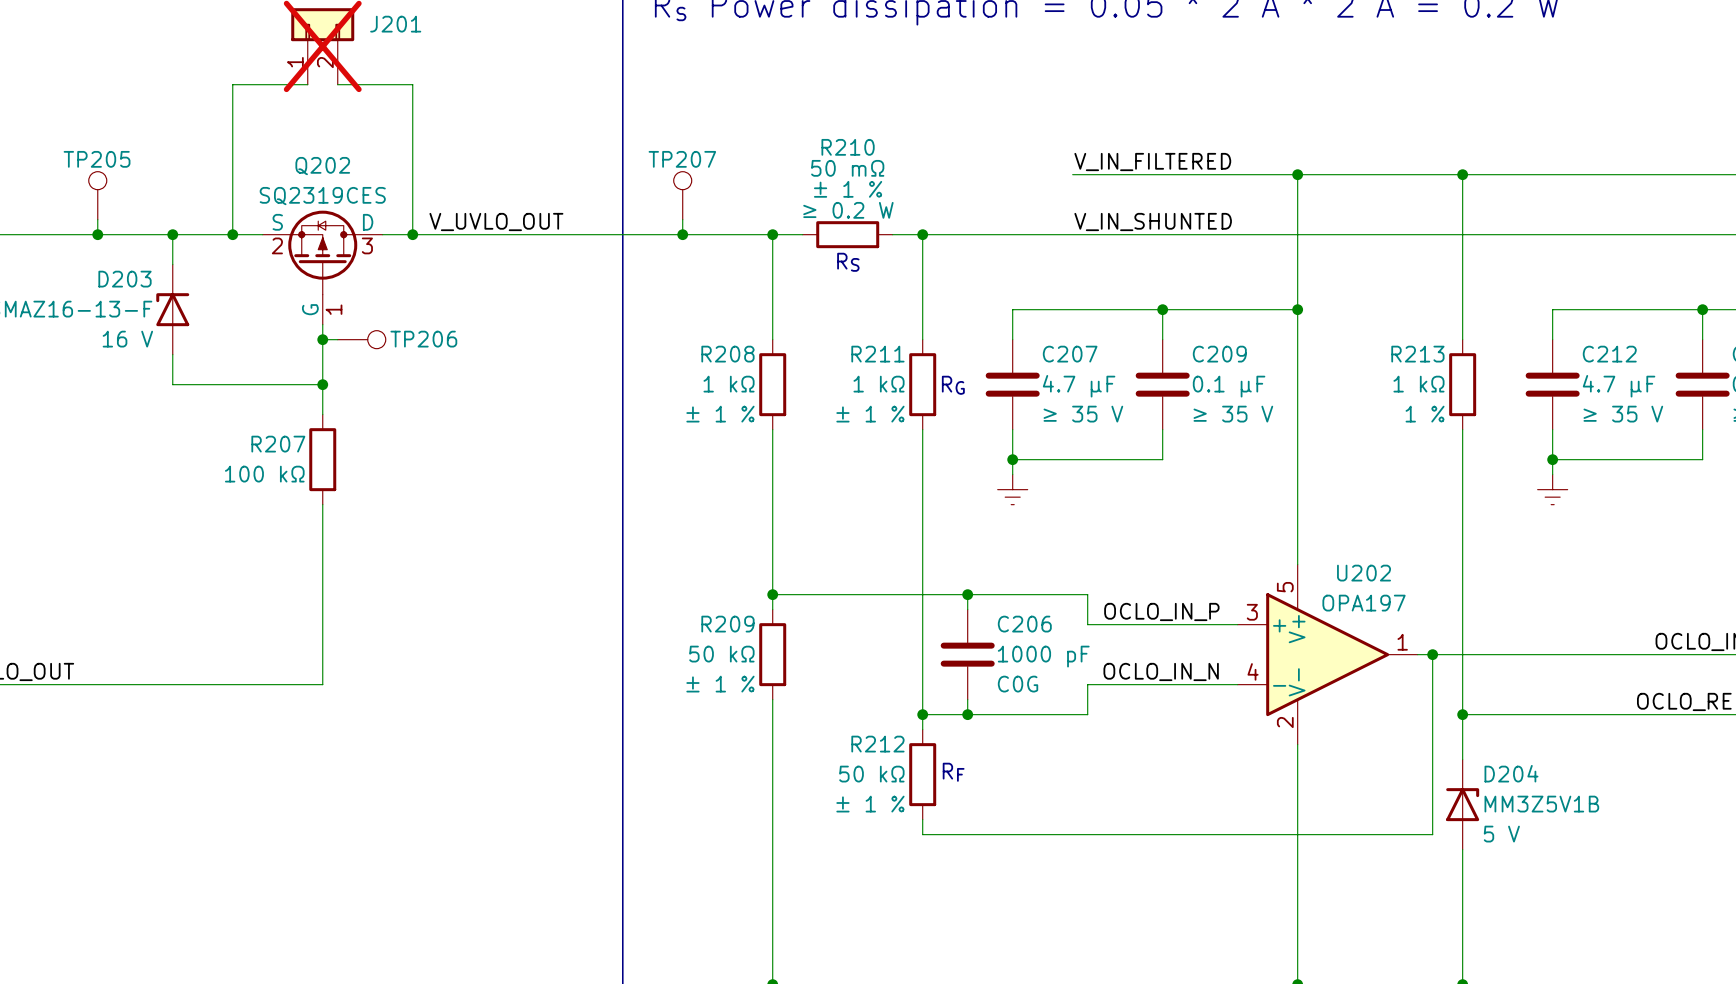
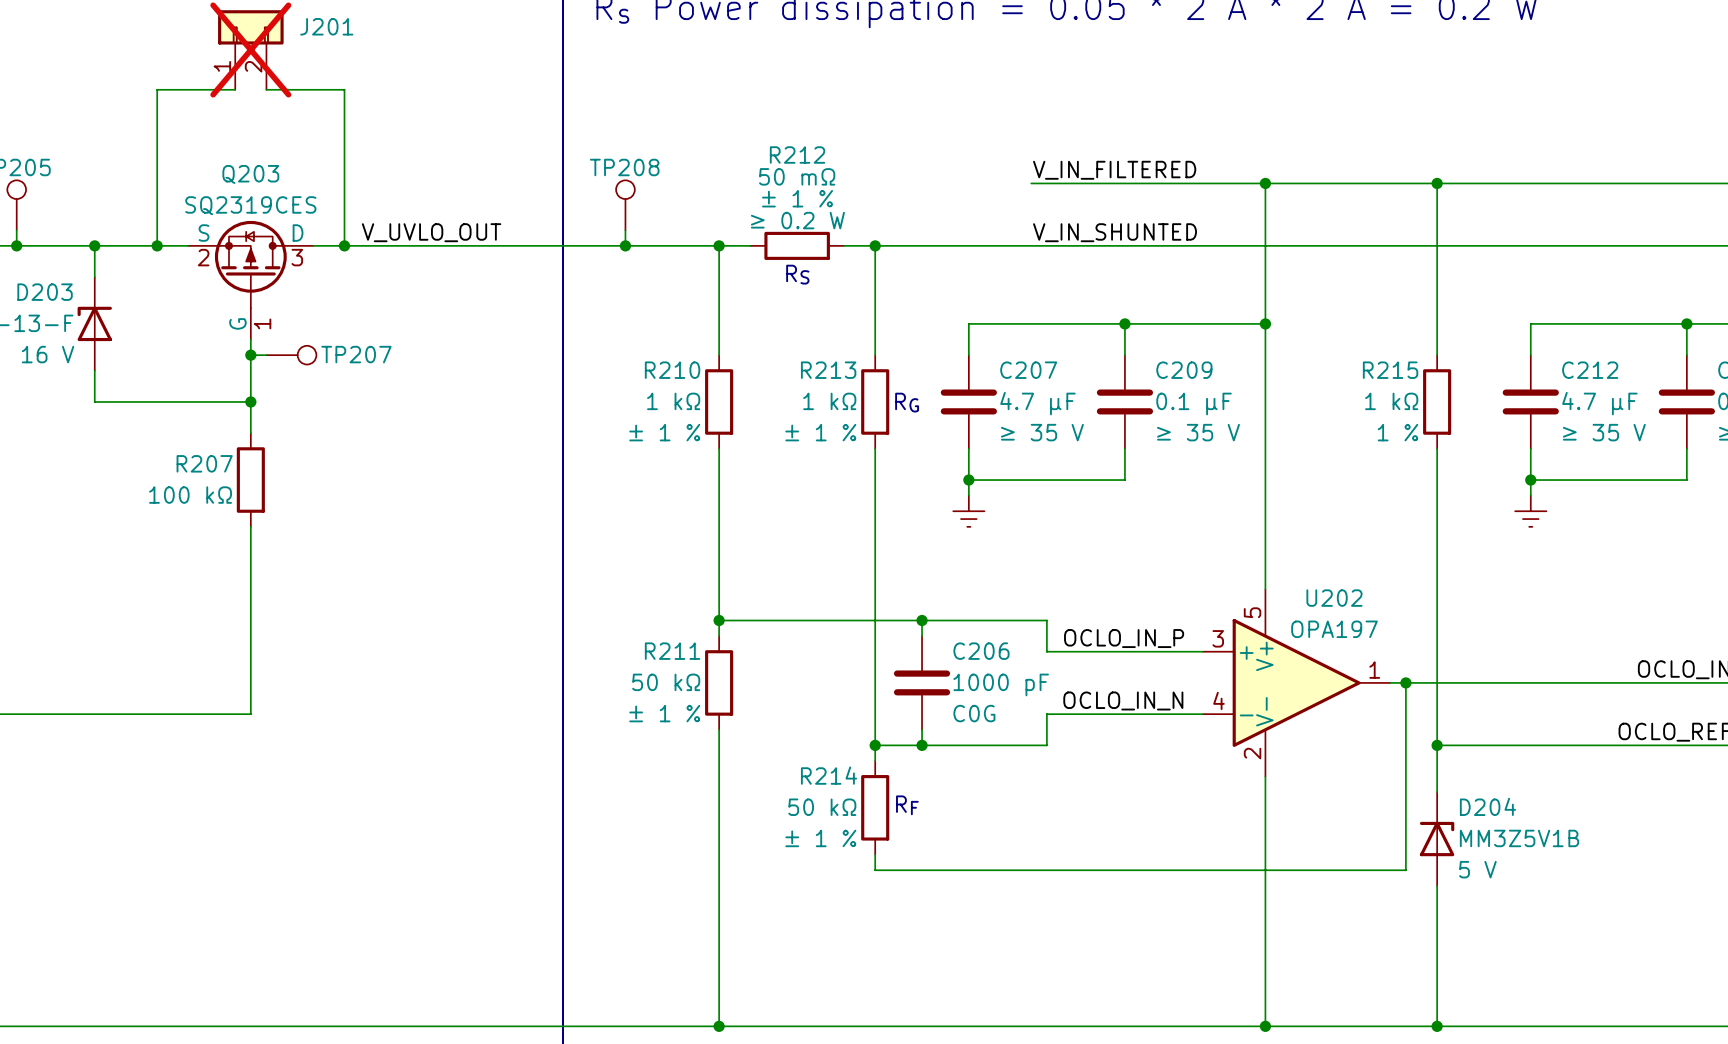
R210 name: R210 (848, 147) -> R212 (797, 155)
TP207 name: TP207 (682, 159) -> TP208 (624, 167)
Q202 name: Q202 (322, 166) -> Q203 (250, 174)
TP206 name: TP206 (423, 339) -> TP207 (356, 354)
R208 name: R208 (727, 354) -> R210 (672, 370)
R211 name: R211 (877, 354) -> R213 (828, 370)
R213 name: R213 (1417, 354) -> R215 (1390, 370)
R209 name: R209 (727, 624) -> R211 (672, 651)
R212 name: R212 (877, 744) -> R214 (829, 775)

